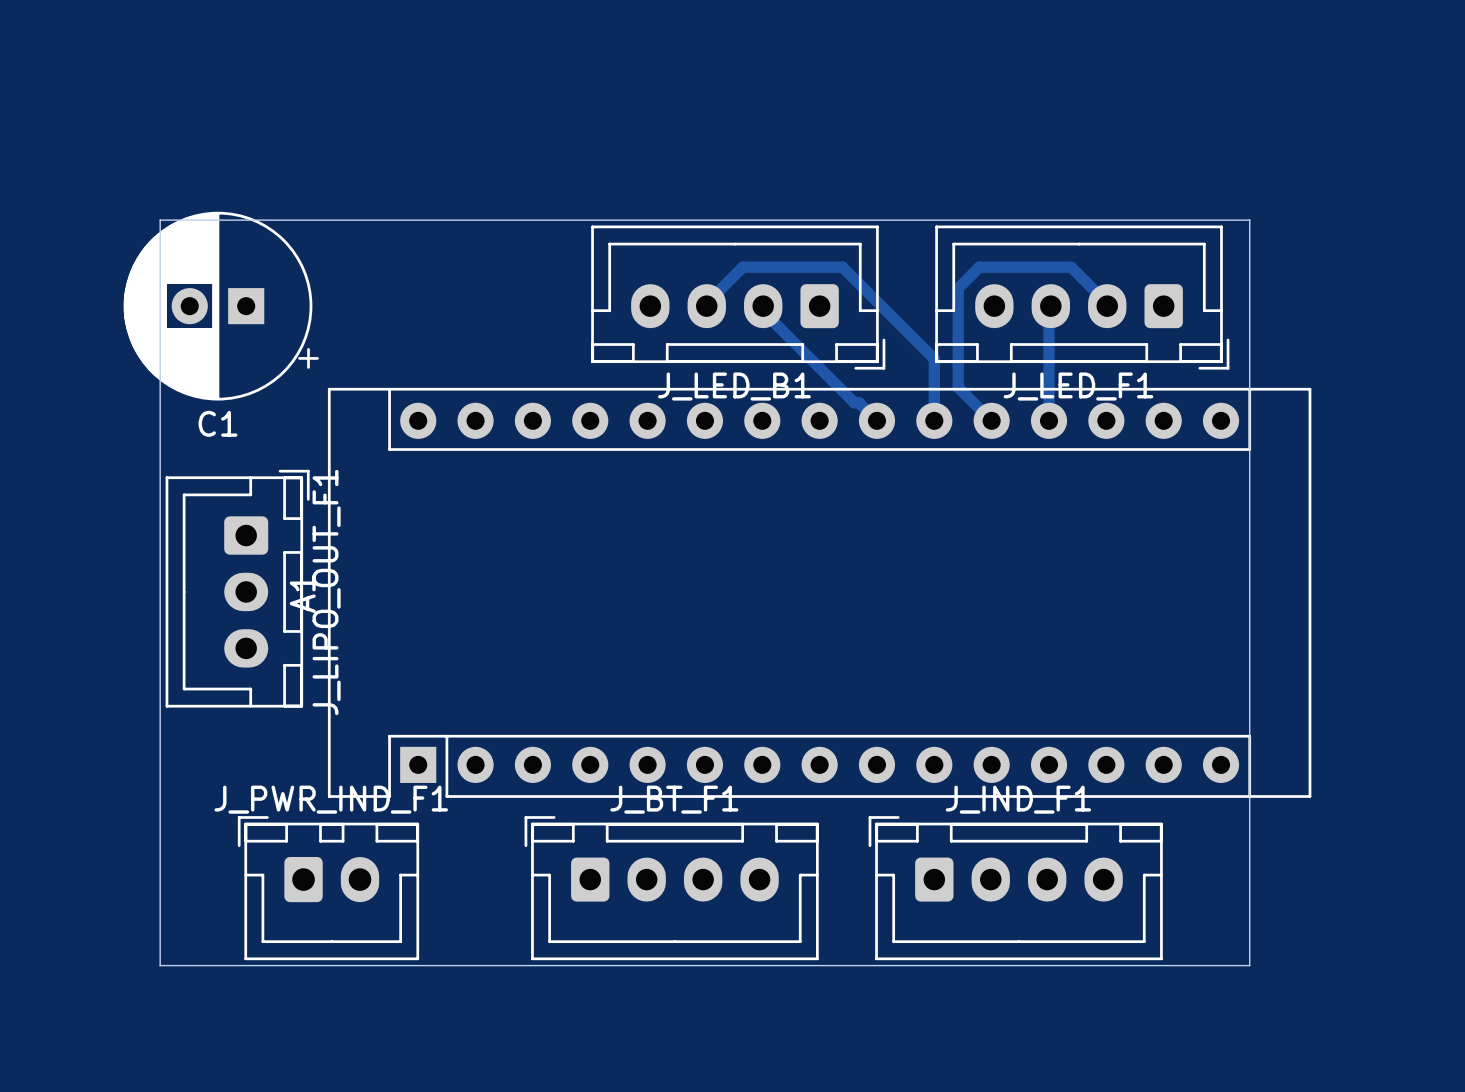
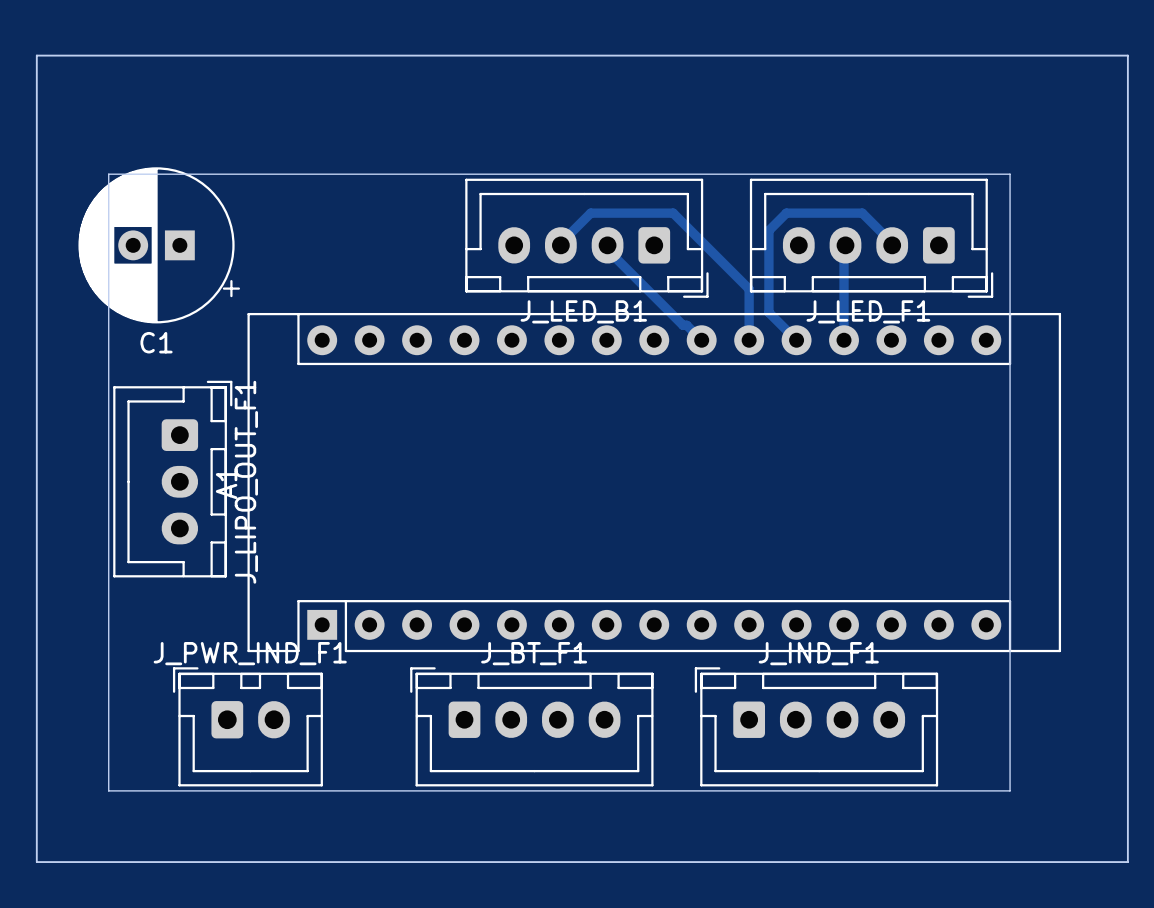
board edge: none -> (36, 55) (1127, 55) (1127, 862) (36, 862) (36, 55)

